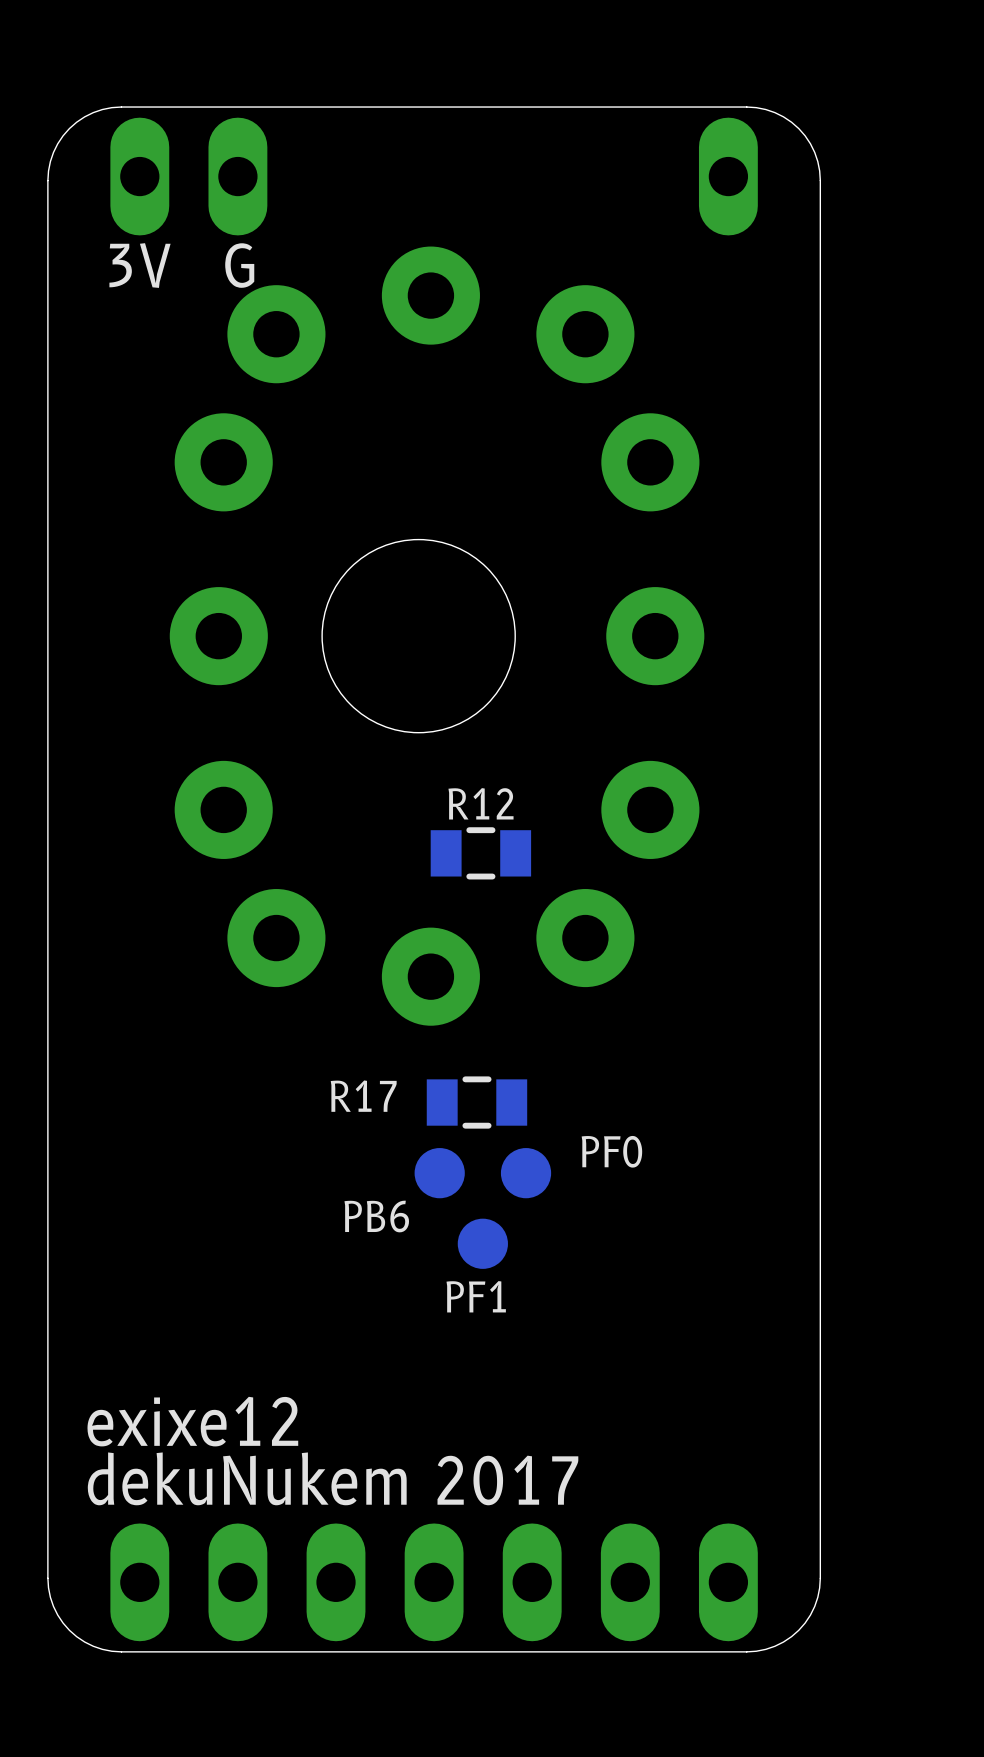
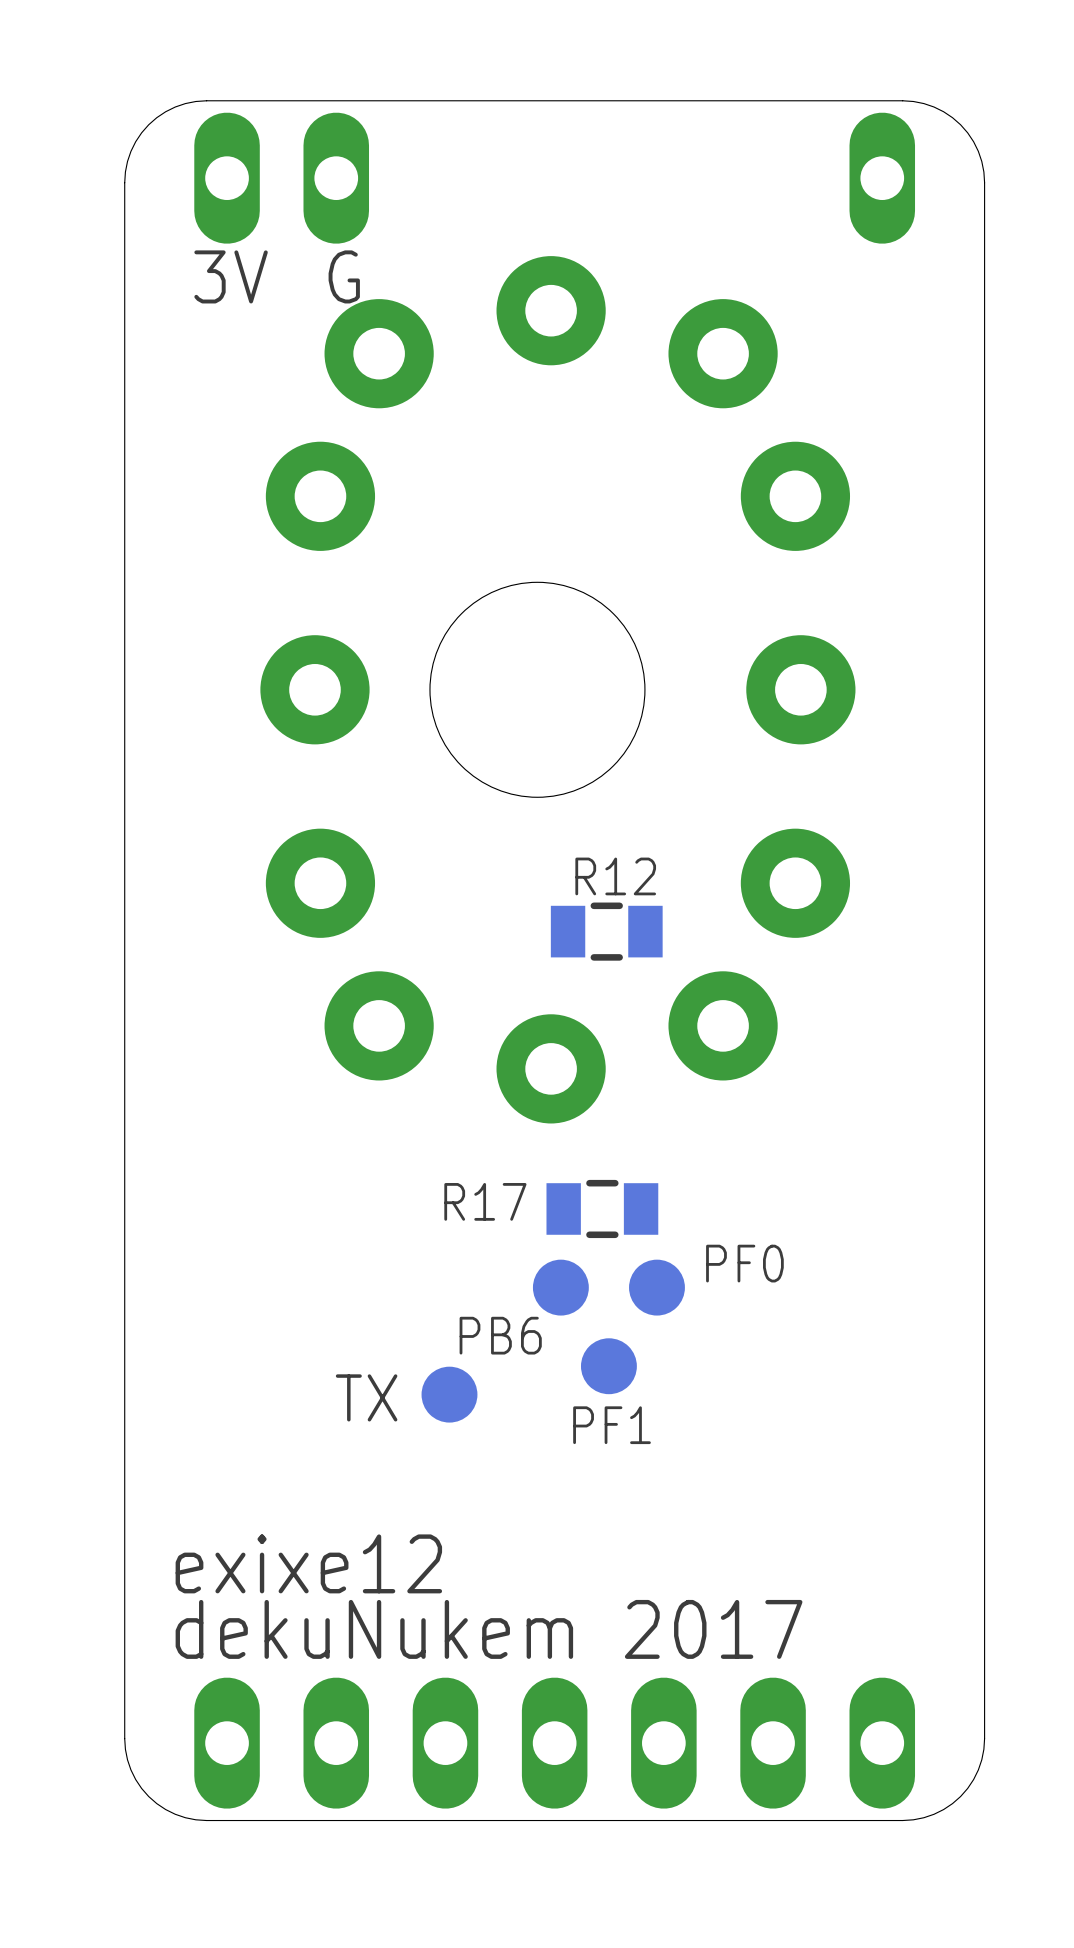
part: none -> (449, 1394)
text: none -> TX (366, 1397)

